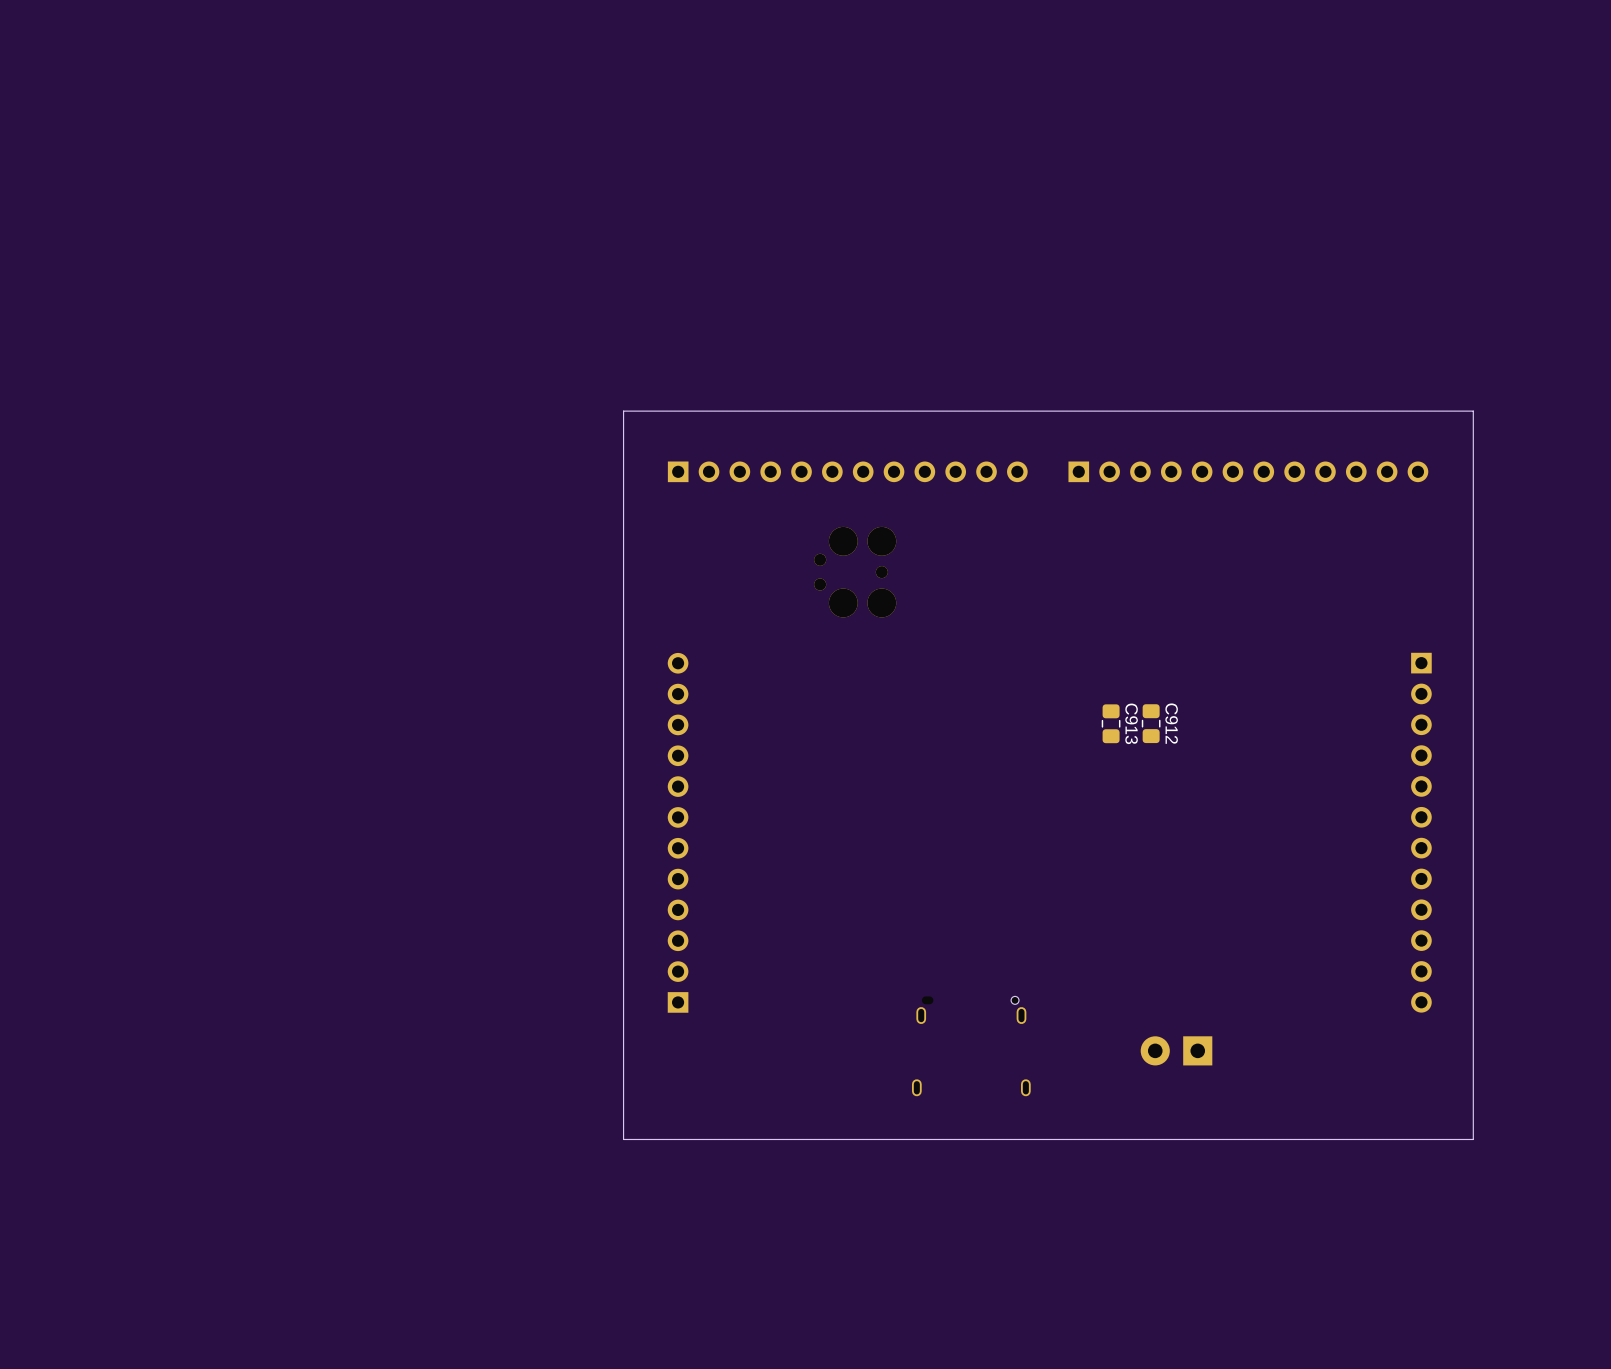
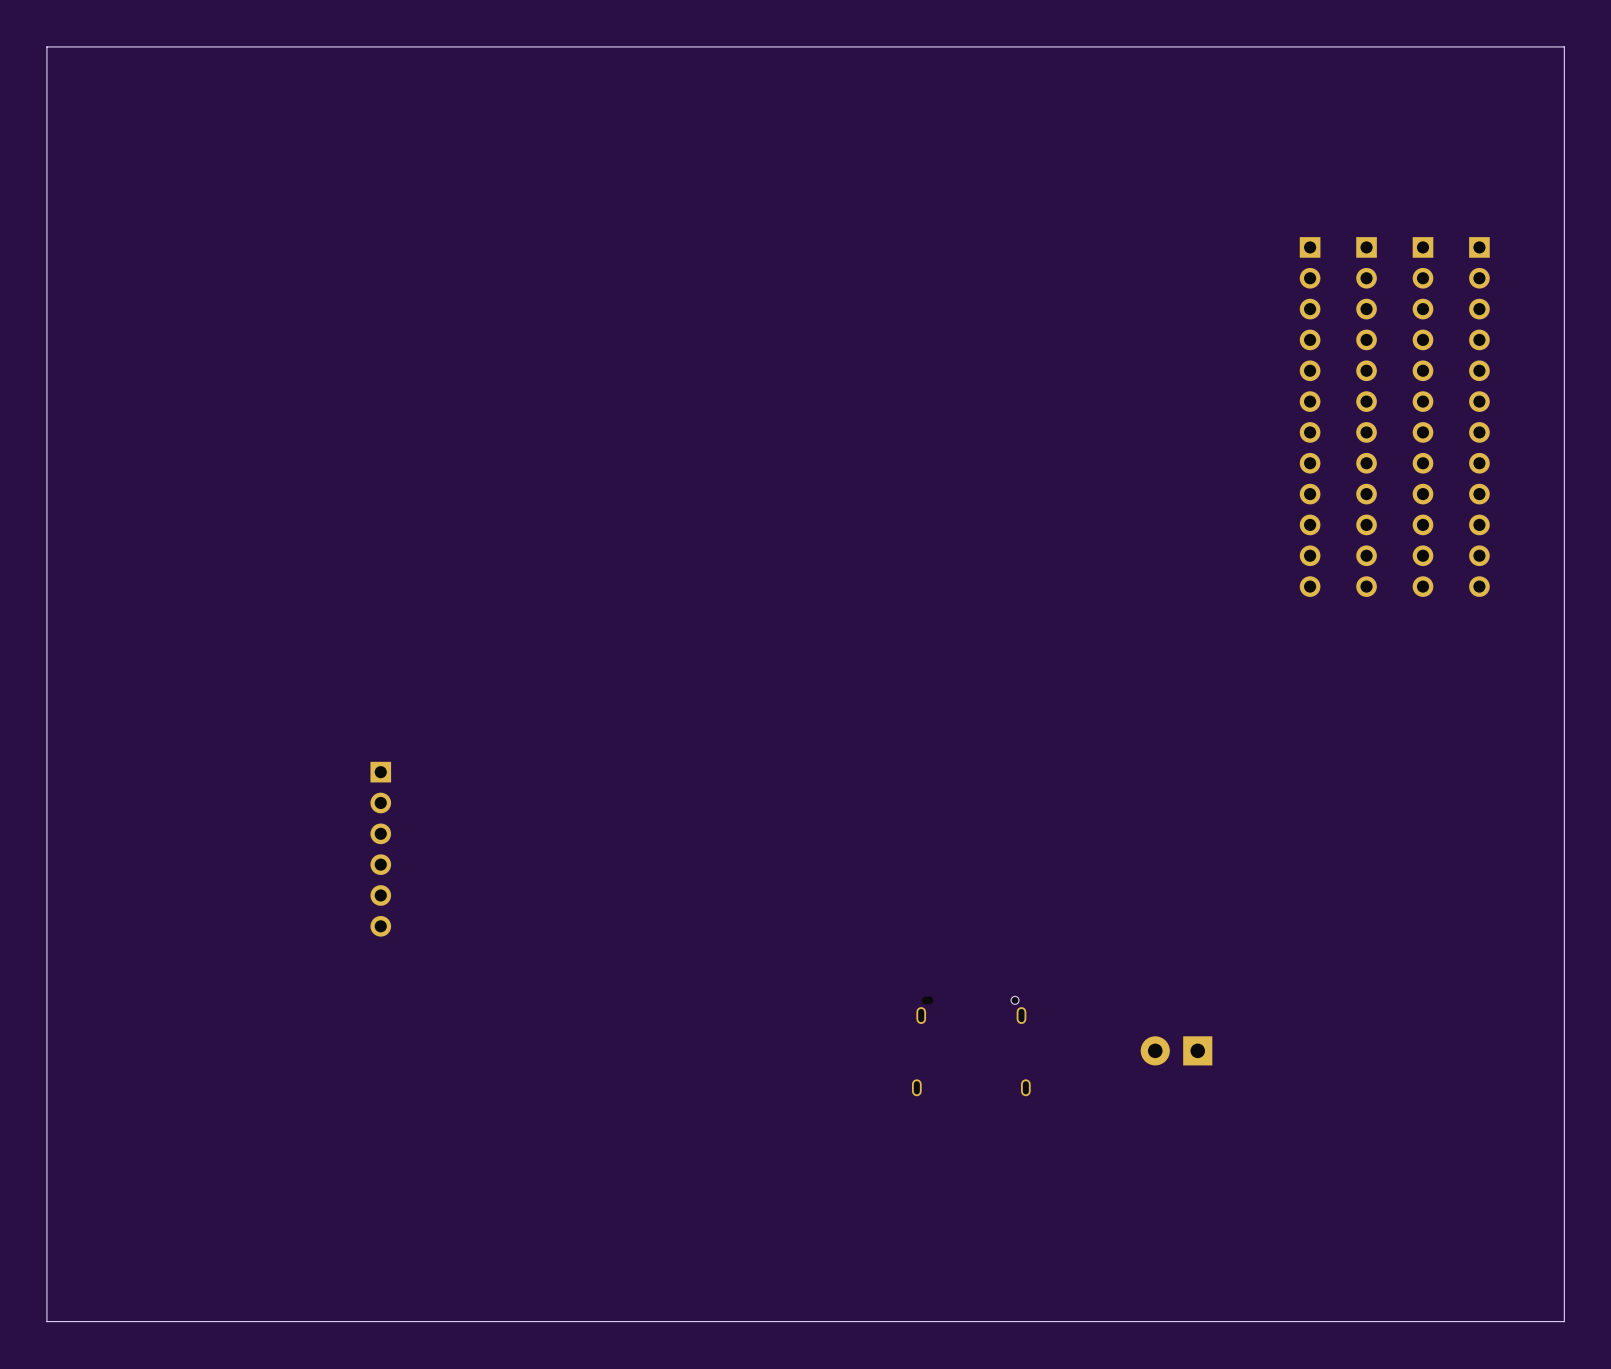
board edge: none -> (1564, 46) (1564, 1321) (46, 1321) (46, 46) (1564, 46)
board edge: (1473, 411) (1473, 1139) (623, 1139) (623, 411) (1473, 411) -> none
part: none -> (1310, 417)
part: none -> (1366, 417)
part: none -> (1422, 417)
part: none -> (1479, 417)
part: (847, 471) -> none
part: (1248, 471) -> none
part: (855, 572) -> none
C913: (1111, 723) -> none
C912: (1151, 723) -> none
part: (678, 832) -> none
part: (1421, 832) -> none
part: none -> (380, 849)

